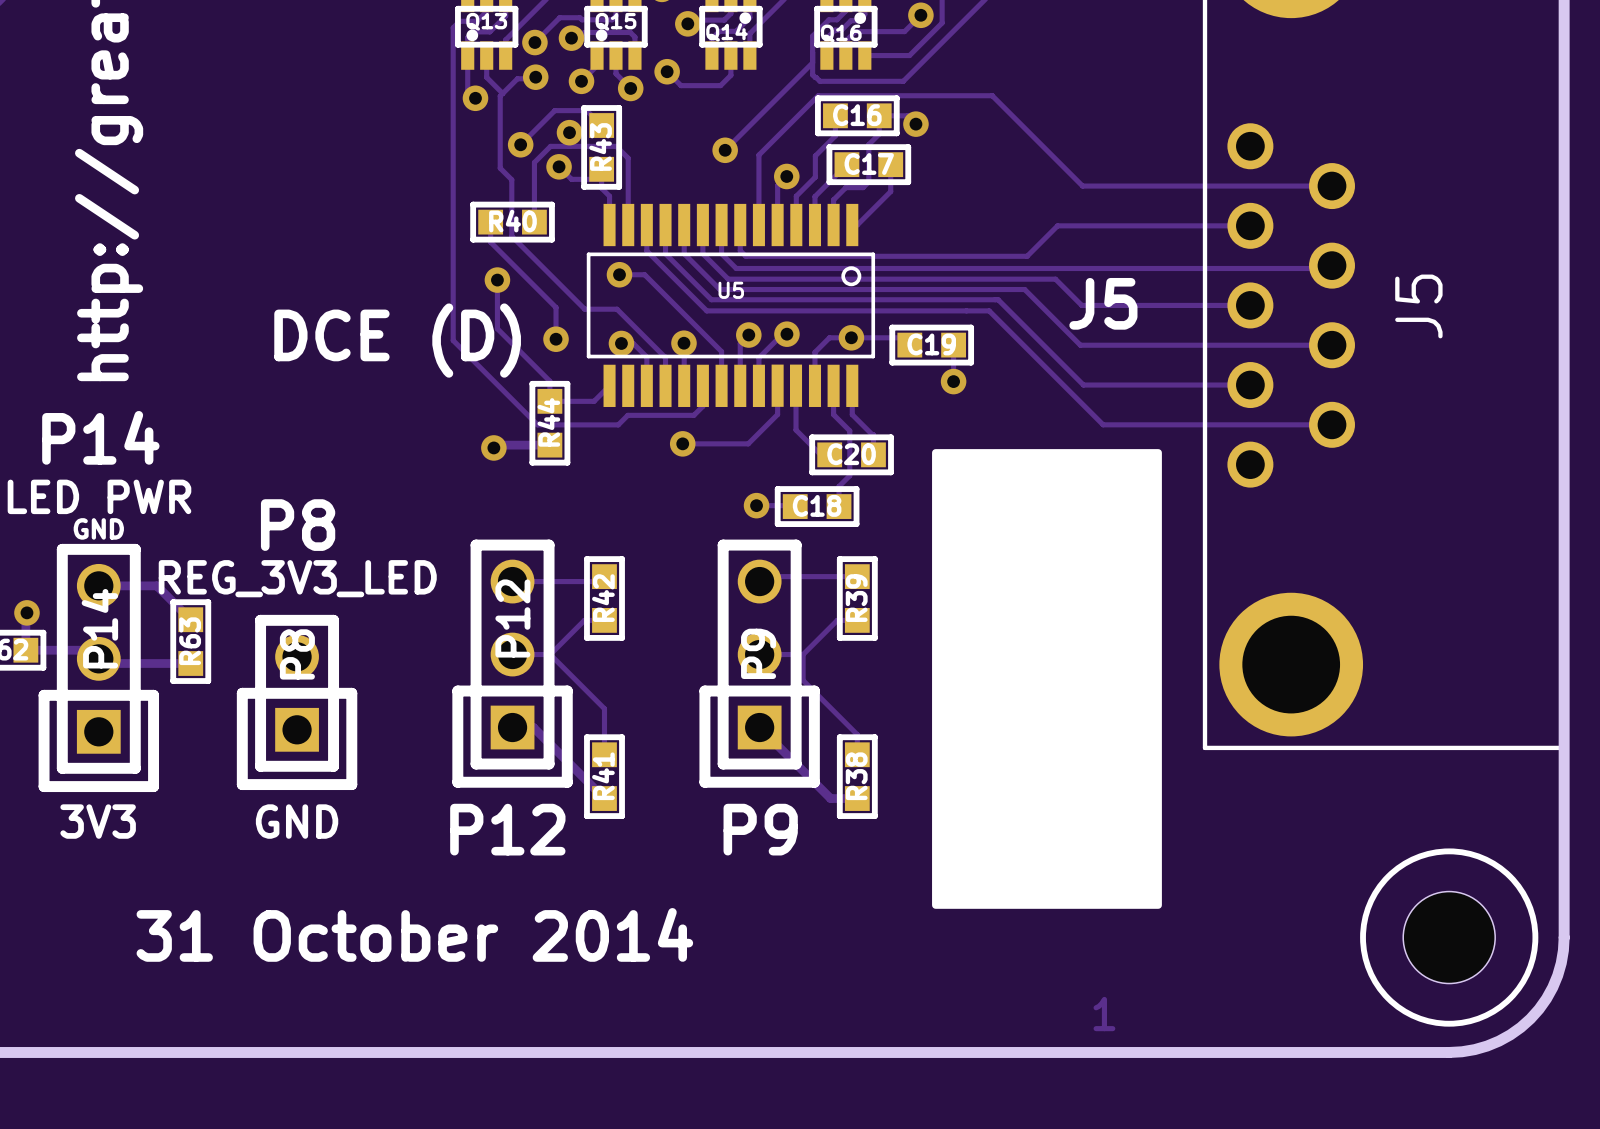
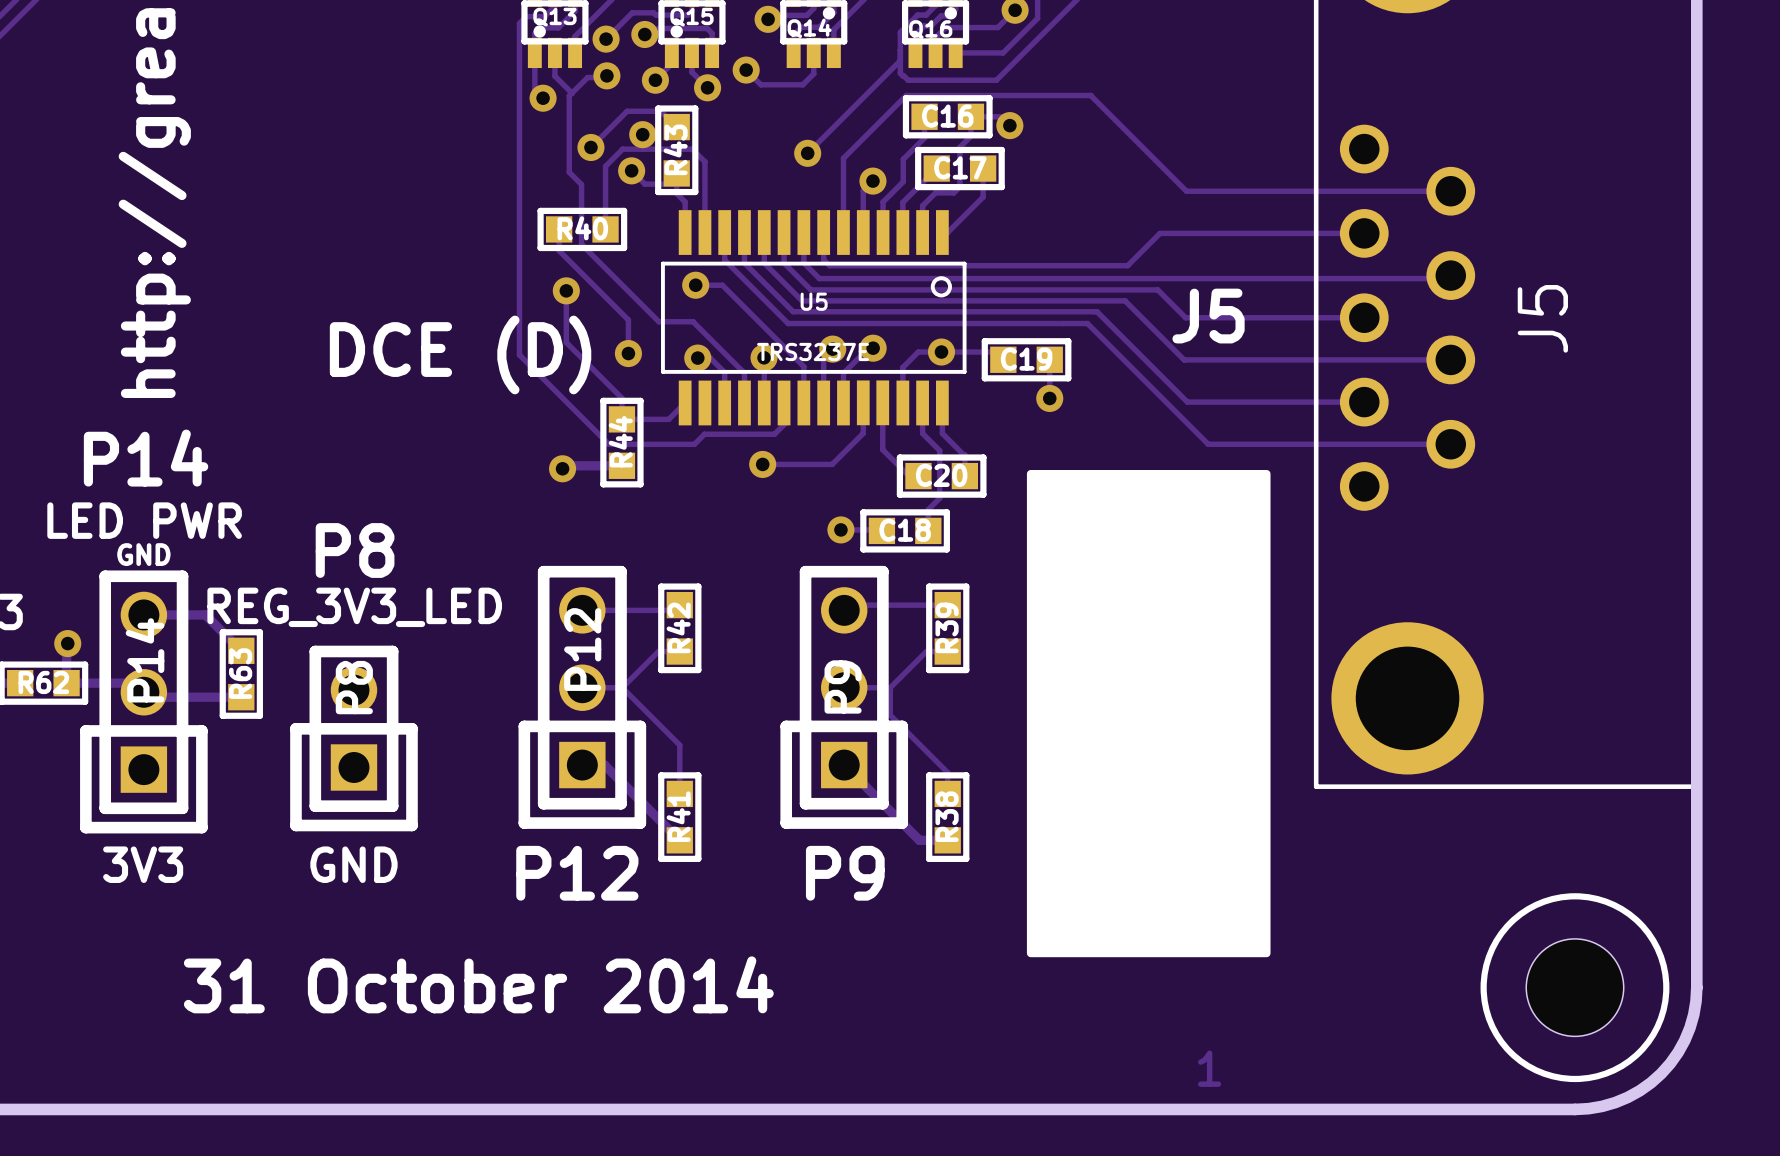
U5 value: none -> TRS3237E (813, 351)

